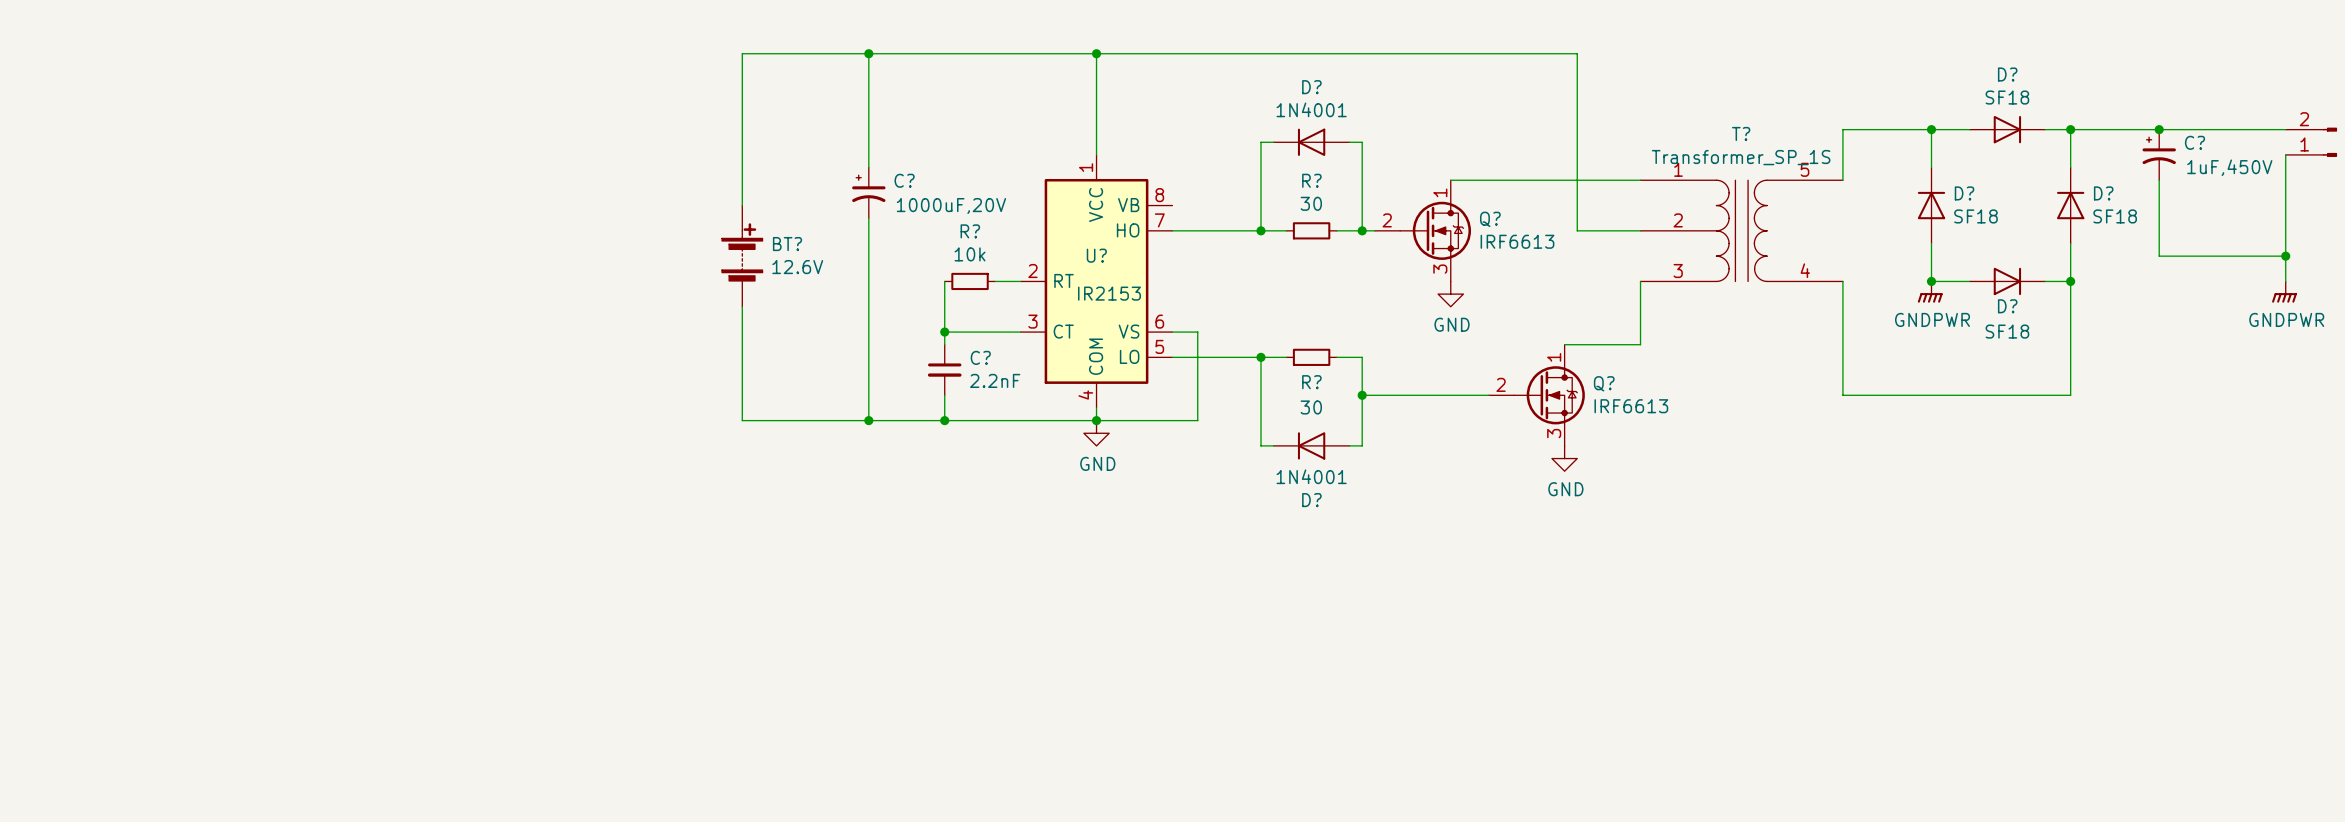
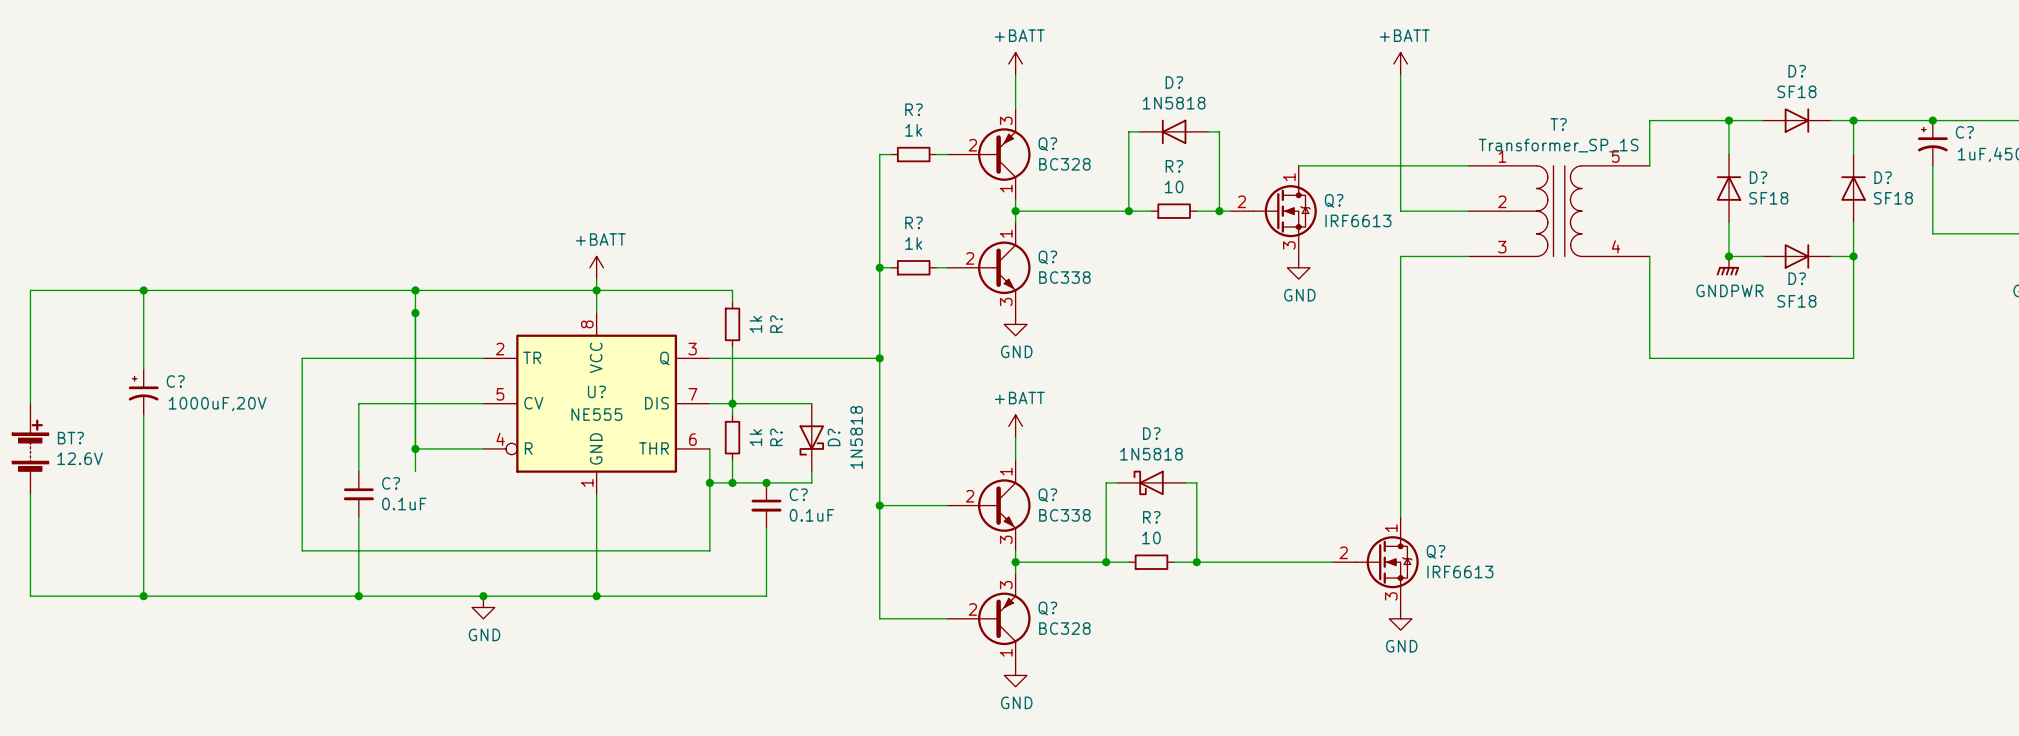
wire: (868, 53) (868, 167) -> none
junction: (868, 53) -> none
wire: (1096, 53) (1096, 154) -> none
junction: (1096, 53) -> none
power symbol: none -> +BATT (1015, 63)
power symbol: none -> +BATT (1400, 63)
wire: none -> (1015, 75) (1015, 109)
D? value: 1N4001 (1311, 109) -> 1N5818 (1174, 103)
wire: none -> (891, 154) (879, 154) (879, 618) (947, 618)
R?: none -> 1k (913, 154)
wire: none -> (936, 154) (947, 154)
Q?: none -> BC328 (989, 154)
C?: 1000uF,20V (868, 192) -> none
R? value: 30 (1311, 203) -> 10 (1174, 186)
wire: (742, 205) (742, 53) (1577, 53) (1577, 230) -> (1400, 75) (1400, 211) (1411, 211)
wire: (868, 218) (868, 420) -> none
junction: none -> (1015, 211)
BT?: 12.6V (742, 256) -> none
wire: (944, 281) (944, 344) -> none
R?: 10k (970, 281) -> none
wire: (995, 281) (1020, 281) -> none
U?: IR2153 (1096, 281) -> none
wire: (1640, 281) (1640, 344) (1564, 344) -> (1468, 256) (1400, 256) (1400, 516)
power symbol: none -> +BATT (596, 267)
wire: none -> (879, 267) (891, 267)
junction: none -> (879, 267)
R?: none -> 1k (913, 267)
Q?: none -> BC338 (989, 267)
wire: none -> (596, 279) (596, 313)
wire: (742, 306) (742, 420) (1197, 420) (1197, 332) (1172, 332) -> none
wire: none -> (143, 290) (143, 369)
junction: none -> (143, 290)
wire: none -> (415, 290) (415, 471)
junction: none -> (415, 290)
junction: none -> (596, 290)
wire: none -> (732, 301) (732, 290) (30, 290) (30, 403)
wire: (944, 332) (1020, 332) -> (879, 505) (947, 505)
junction: (944, 332) -> none
junction: none -> (415, 313)
R?: none -> 1k (732, 324)
wire: (1172, 357) (1286, 357) -> none
wire: (1260, 357) (1260, 445) (1273, 445) -> none
junction: (1260, 357) -> none
R?: 30 (1311, 357) -> none
wire: (1336, 357) (1362, 357) (1362, 445) (1349, 445) -> none
C?: 2.2nF (944, 370) -> none
wire: none -> (732, 347) (732, 414)
wire: none -> (483, 358) (302, 358) (302, 550) (709, 550) (709, 448)
wire: none -> (709, 358) (879, 358)
wire: (944, 395) (944, 420) -> (732, 460) (732, 482)
junction: none -> (879, 358)
wire: (1362, 395) (1488, 395) -> none
junction: (1362, 395) -> none
Q? position: (1536, 395) -> (1375, 562)
wire: (1096, 407) (1096, 420) -> none
junction position: (868, 420) -> (732, 403)
junction: (944, 420) -> none
junction: (1096, 420) -> none
C?: none -> 1000uF,20V (143, 392)
power symbol position: GND (1096, 433) -> GND (1015, 324)
wire: none -> (483, 403) (358, 403) (358, 471)
U?: none -> NE555 (596, 403)
wire: none -> (709, 403) (811, 403)
D?: 1N4001 (1311, 445) -> none
wire: none -> (143, 414) (143, 596)
power symbol: GND (1564, 458) -> none
power symbol: none -> +BATT (1015, 426)
R?: none -> 1k (732, 437)
D?: none -> 1N5818 (811, 437)
wire: none -> (1015, 437) (1015, 460)
BT?: none -> 12.6V (30, 448)
wire: none -> (415, 448) (483, 448)
junction: none -> (415, 448)
wire: none -> (811, 471) (811, 482) (709, 482)
junction: none -> (709, 482)
junction: none -> (732, 482)
junction: none -> (766, 482)
wire: none -> (1117, 482) (1106, 482) (1106, 562)
D?: none -> 1N5818 (1151, 482)
wire: none -> (1185, 482) (1196, 482) (1196, 562)
wire: none -> (30, 494) (30, 596) (766, 596) (766, 528)
C?: none -> 0.1uF (358, 494)
wire: none -> (596, 494) (596, 596)
C?: none -> 0.1uF (766, 505)
junction: none -> (879, 505)
Q?: none -> BC338 (989, 505)
wire: none -> (358, 516) (358, 596)
wire: none -> (1015, 550) (1015, 573)
wire: none -> (1015, 562) (1128, 562)
junction: none -> (1015, 562)
junction: none -> (1106, 562)
R?: none -> 10 (1151, 562)
wire: none -> (1174, 562) (1332, 562)
junction: none -> (1196, 562)
junction: none -> (143, 596)
junction: none -> (358, 596)
junction: none -> (483, 596)
junction: none -> (596, 596)
power symbol: none -> GND (483, 607)
Q?: none -> BC328 (989, 618)
power symbol: none -> GND (1400, 618)
power symbol: none -> GND (1015, 675)

